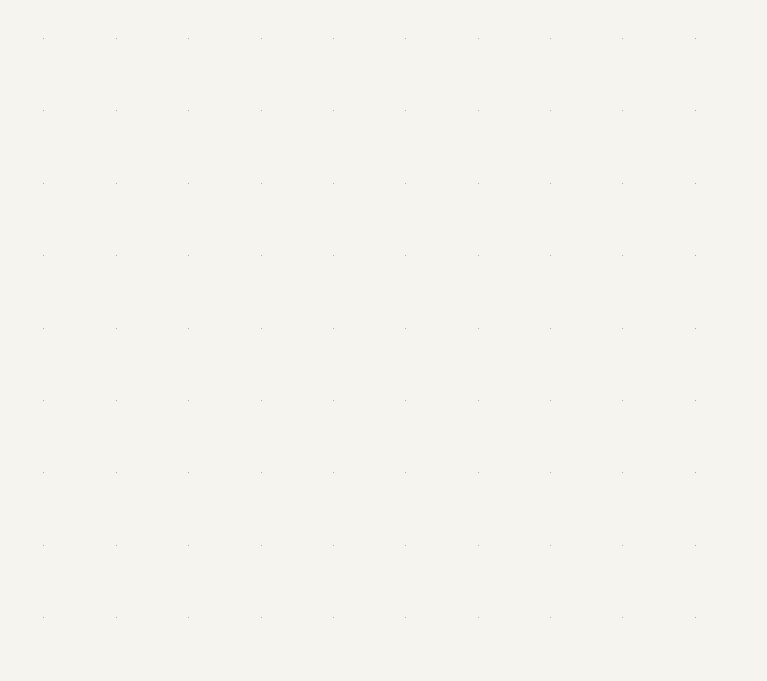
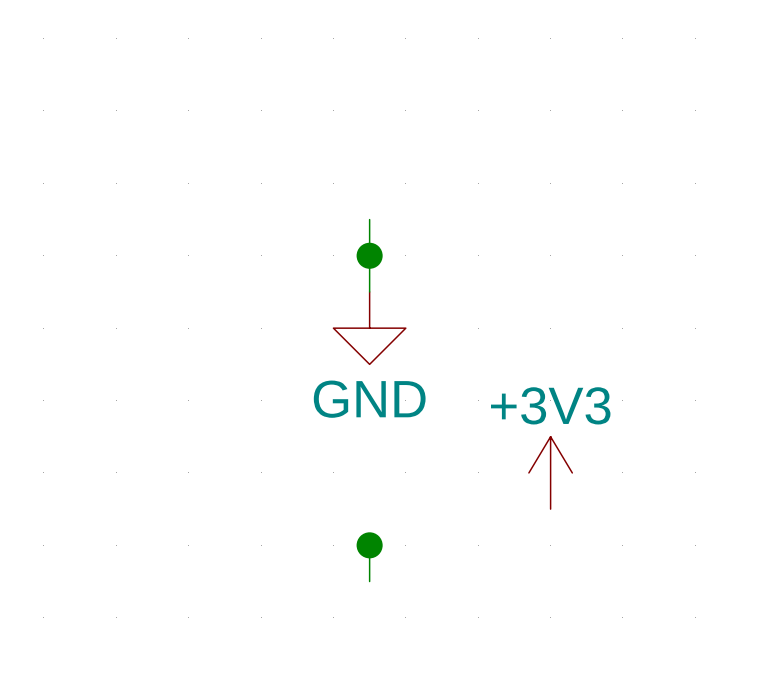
wire: none -> (369, 219) (369, 291)
junction: none -> (369, 255)
power symbol: none -> GND (369, 328)
power symbol: none -> +3V3 (550, 472)
wire: none -> (369, 545) (369, 581)
junction: none -> (369, 545)

